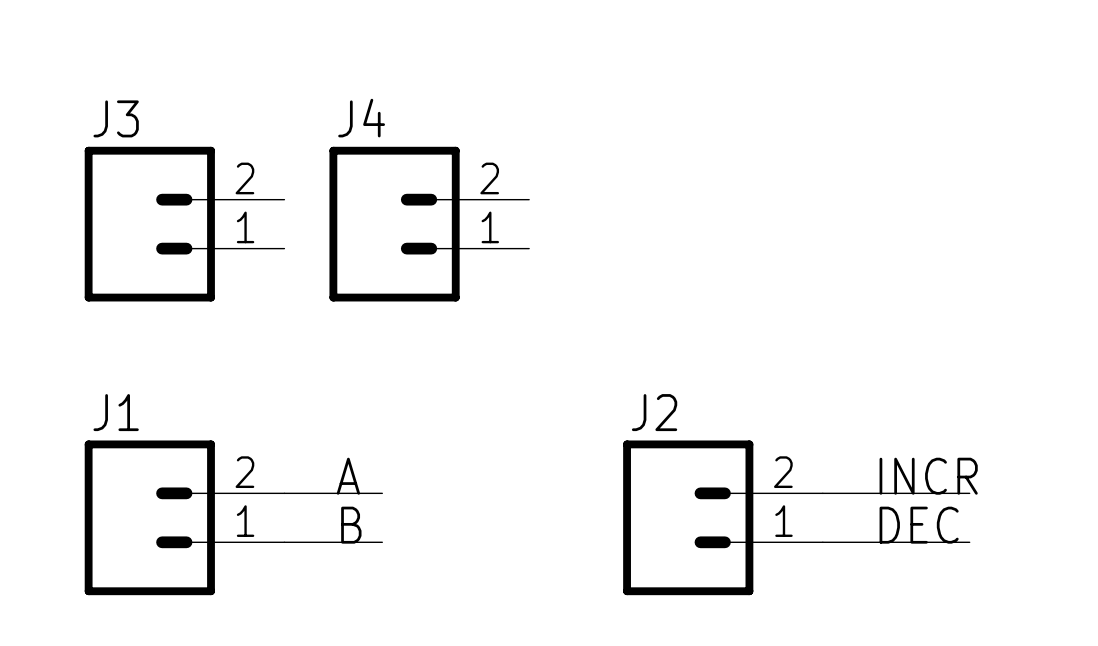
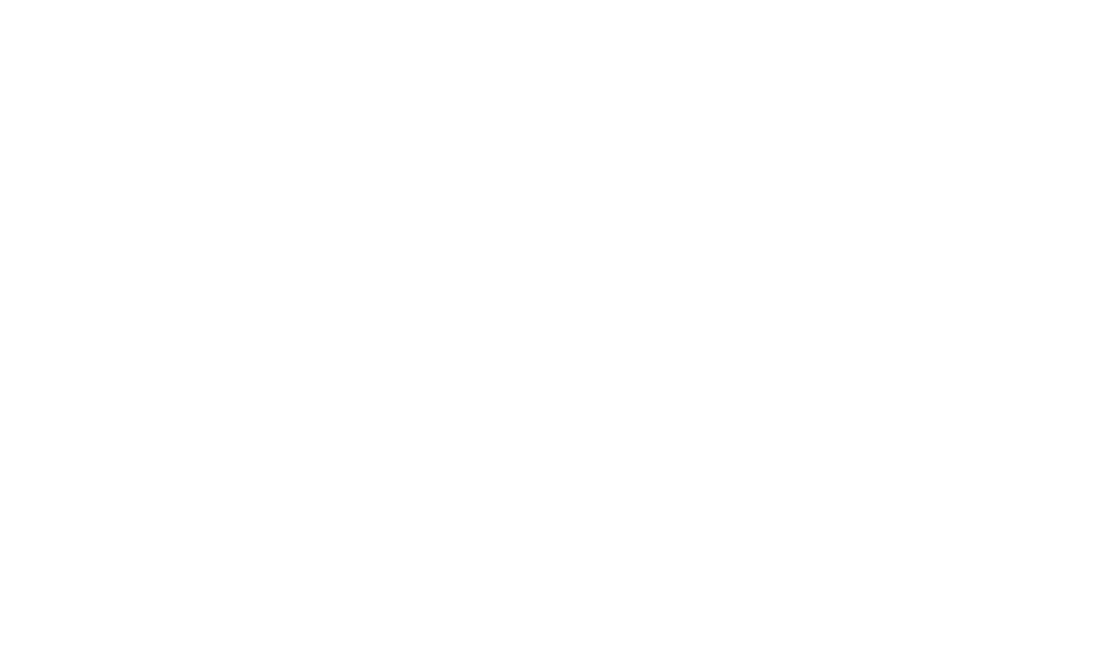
J3: (184, 224) -> none
J4: (429, 224) -> none
label: A (348, 476) -> none
label: INCR (928, 476) -> none
wire: (284, 493) (382, 493) -> none
wire: (822, 493) (969, 493) -> none
J1: (184, 517) -> none
J2: (722, 517) -> none
label: B (351, 525) -> none
label: DEC (919, 525) -> none
wire: (284, 542) (382, 542) -> none
wire: (822, 542) (969, 542) -> none

